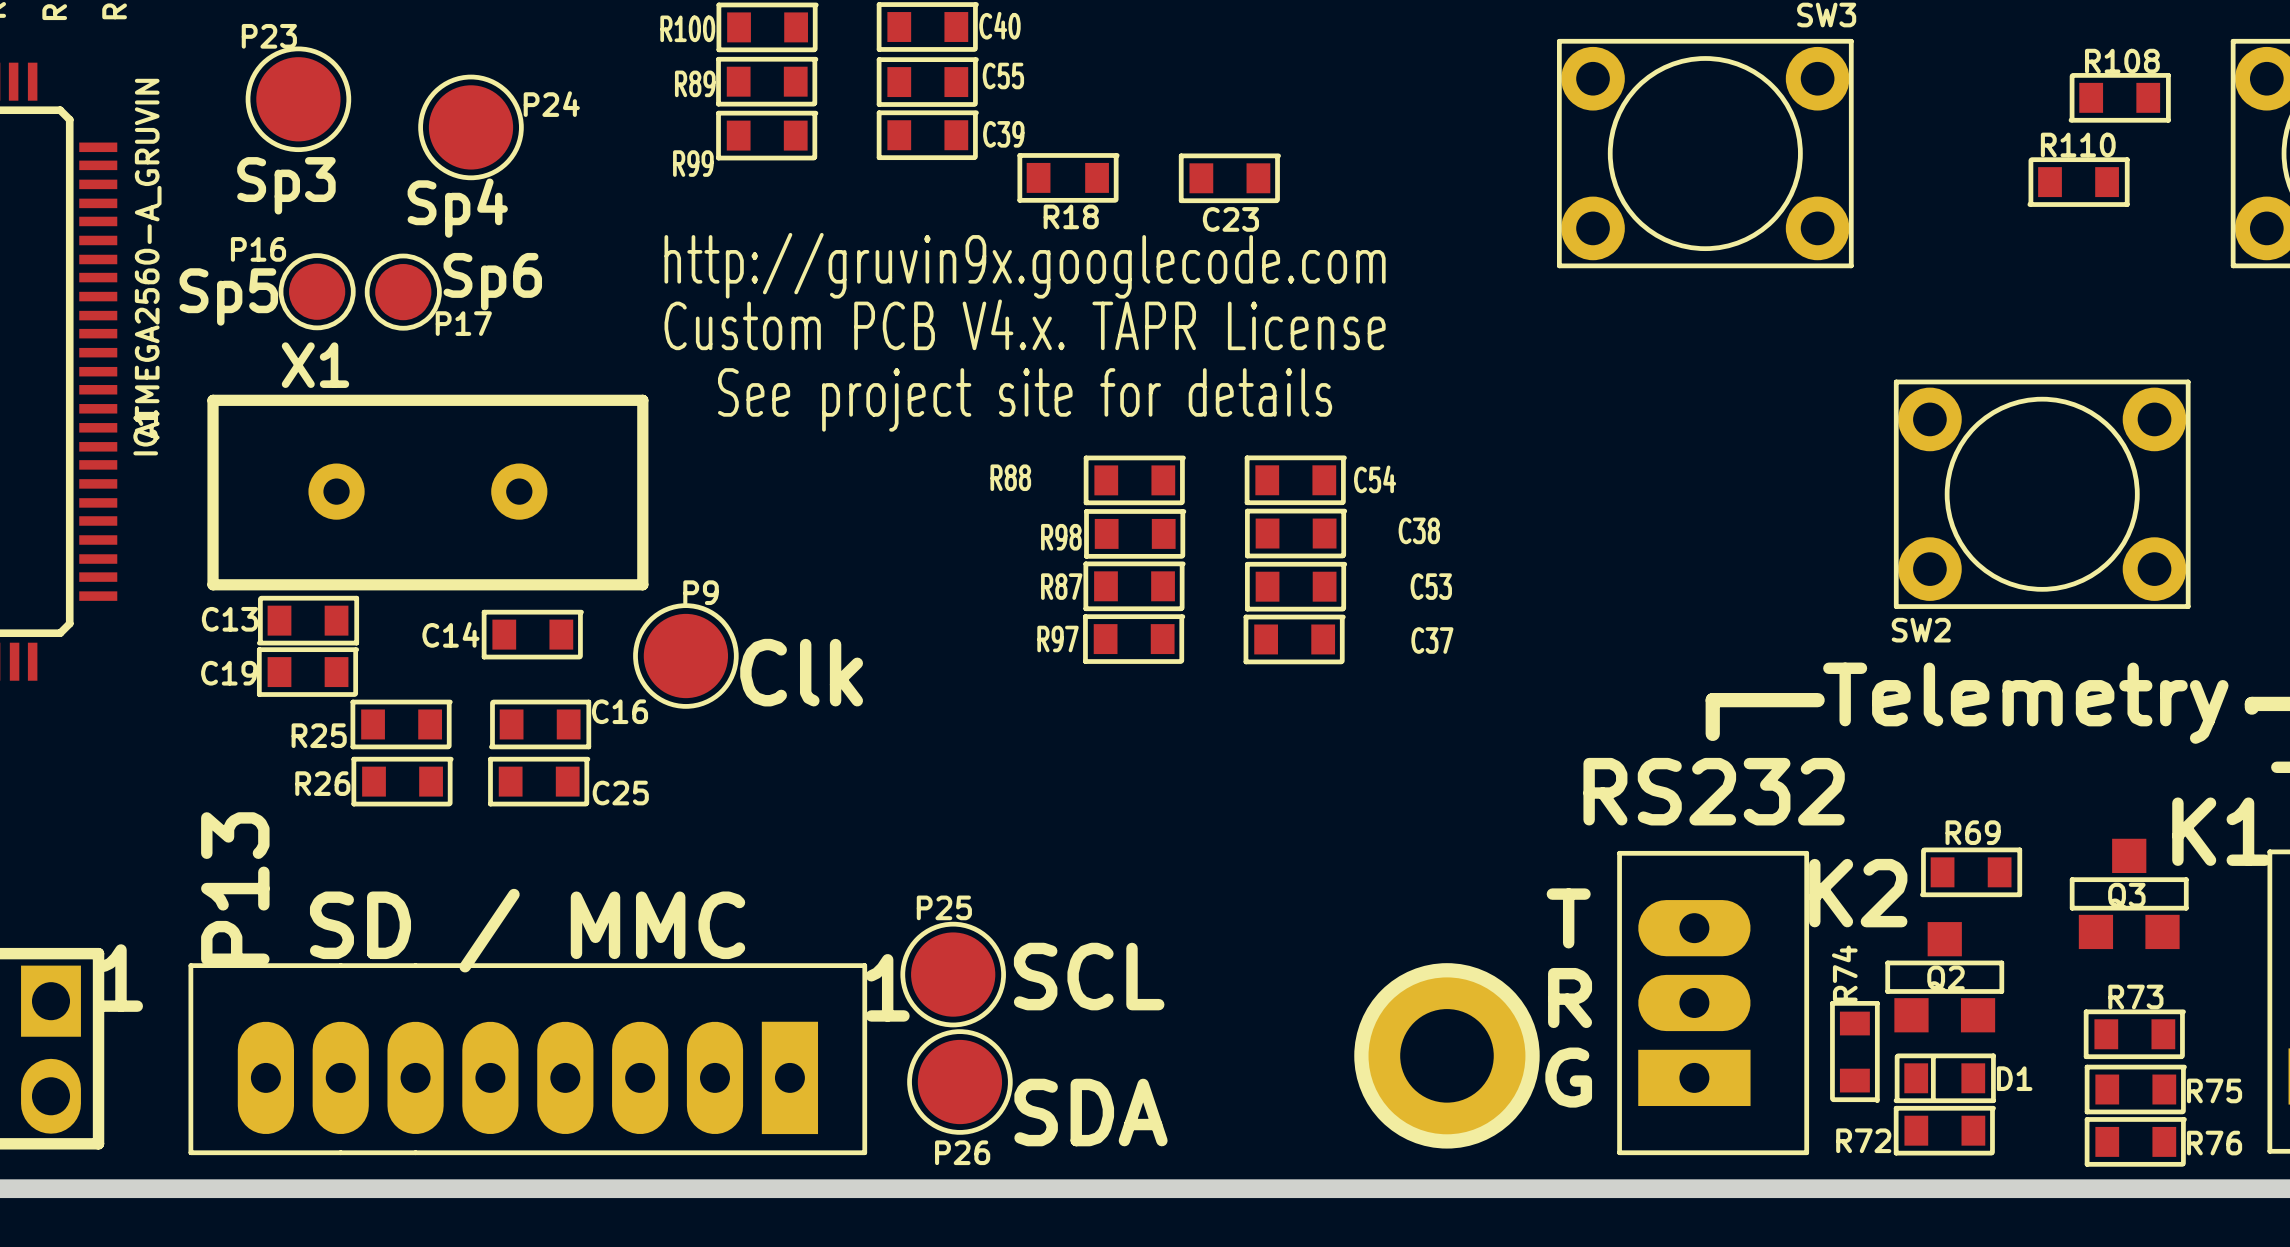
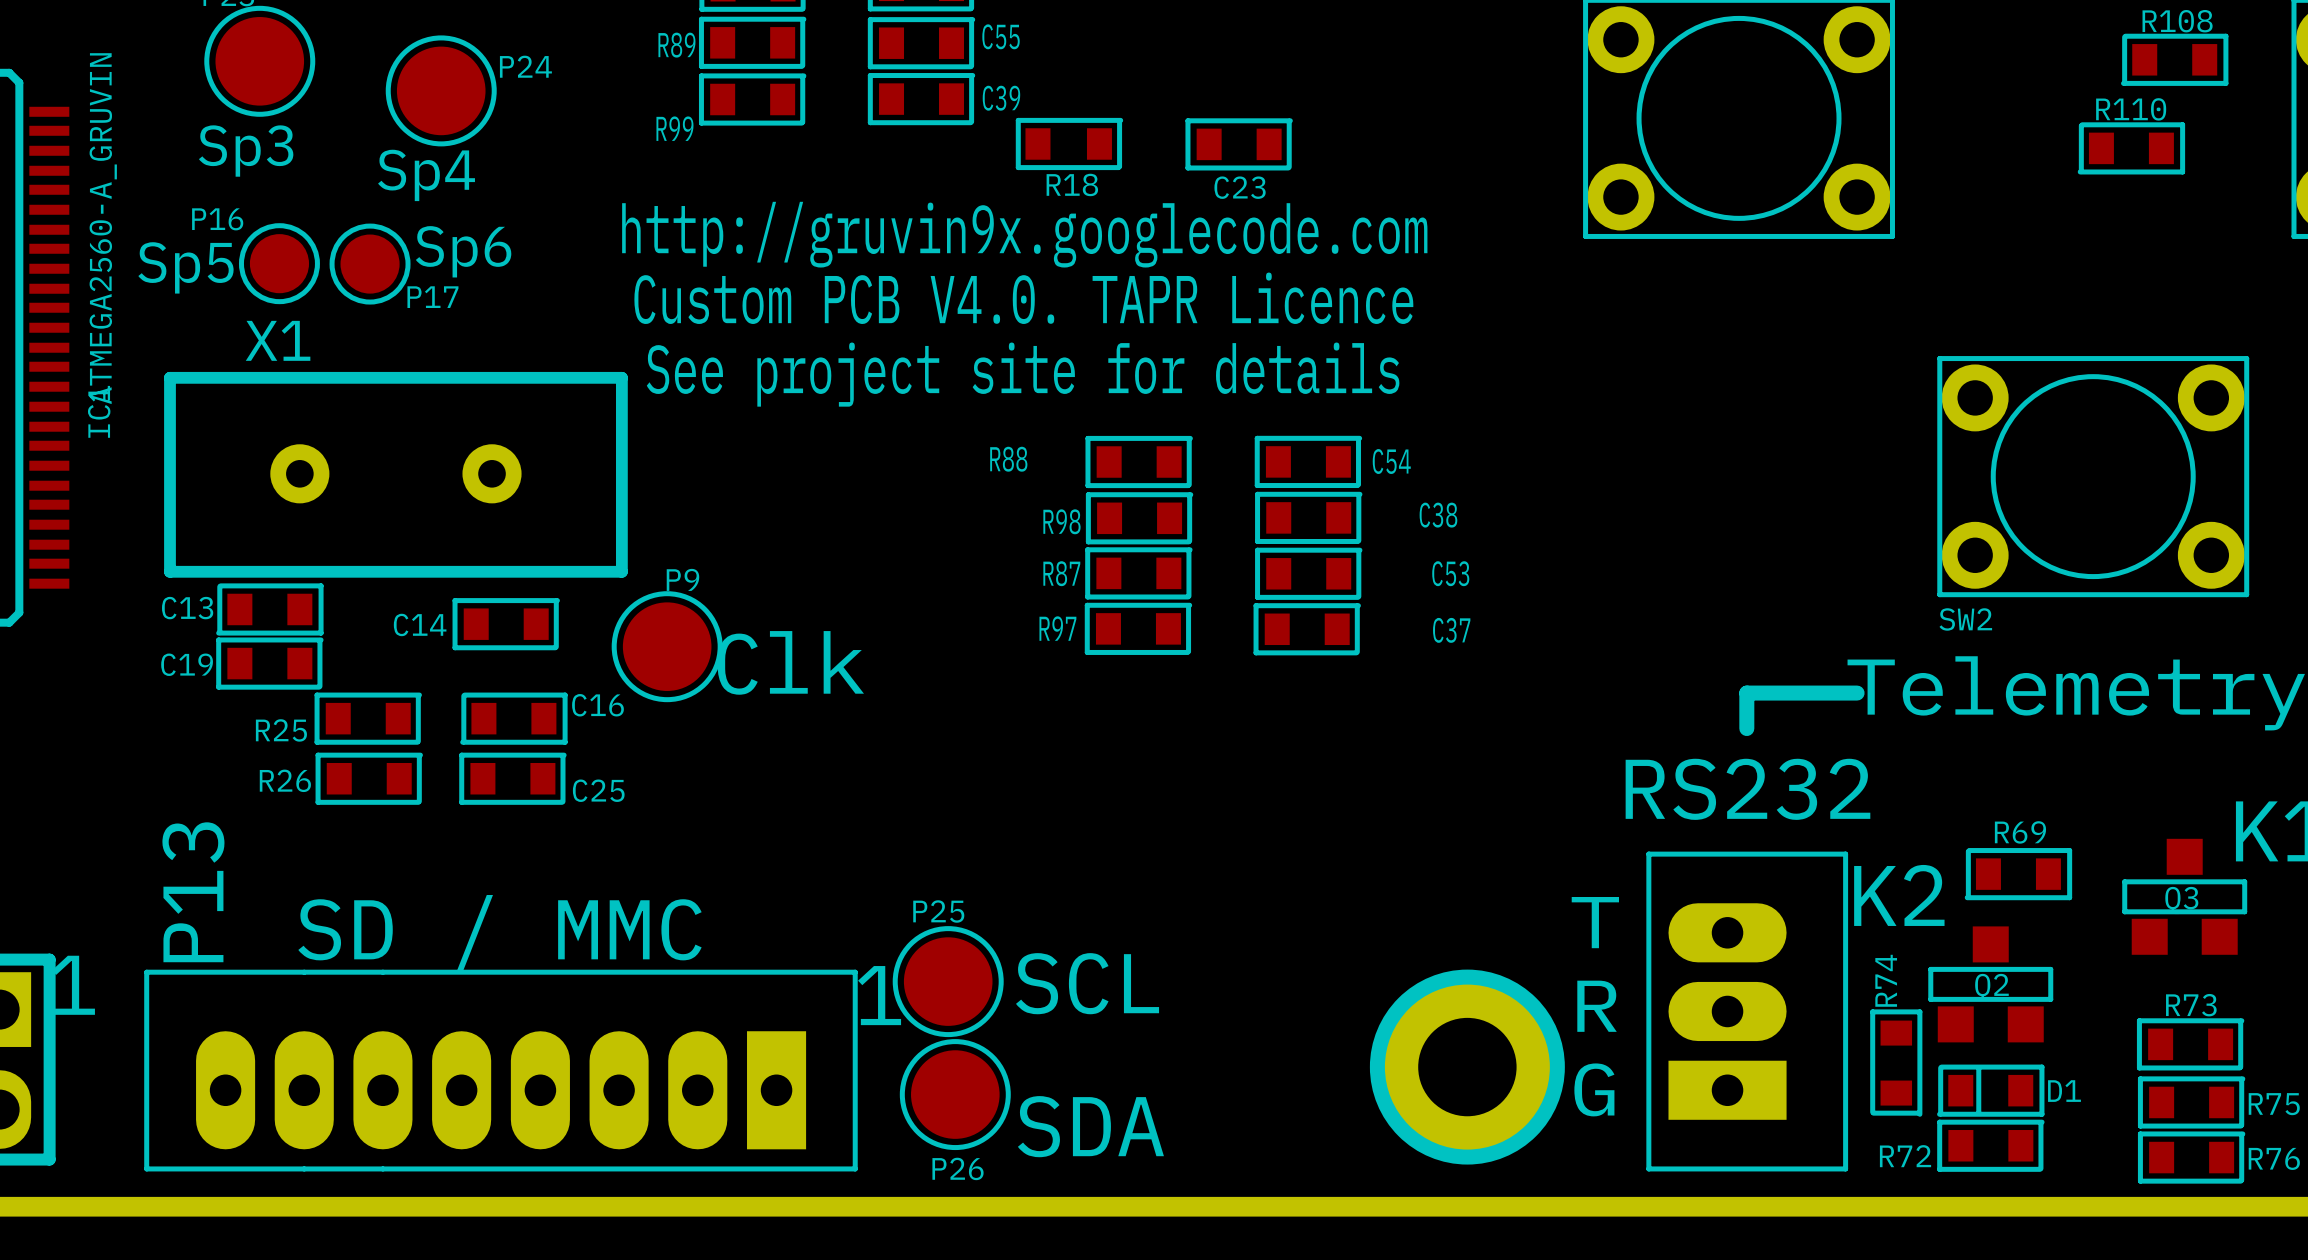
text: Custom PCB V4.x. TAPR License (1025, 324) -> Custom PCB V4.0. TAPR Licence (1023, 298)

